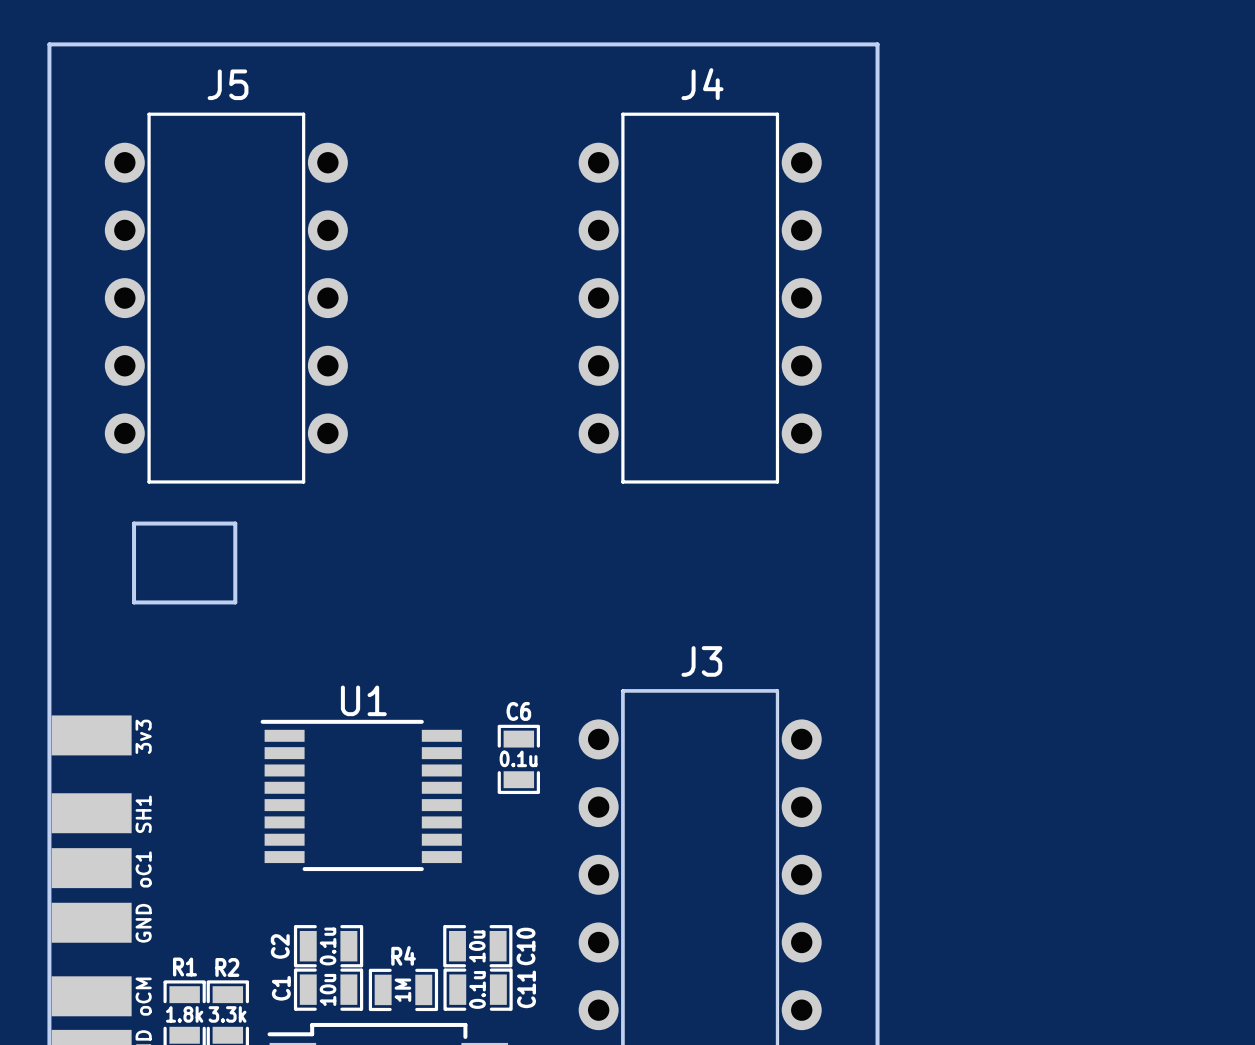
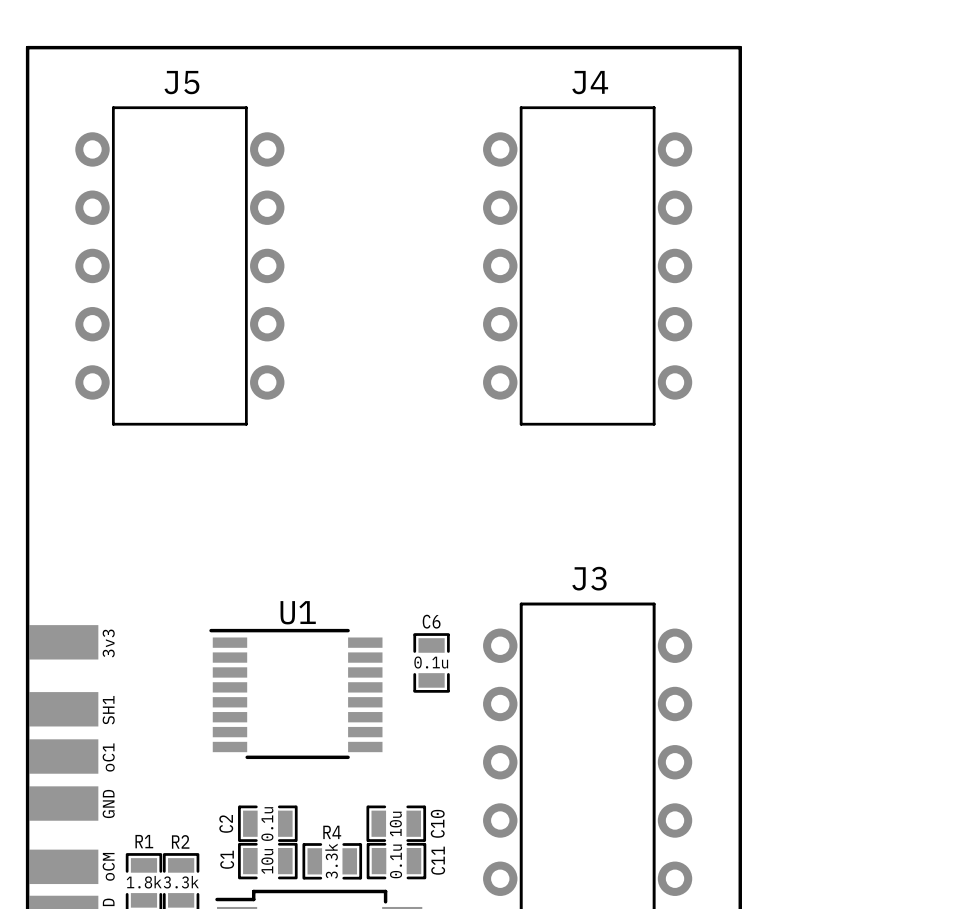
board edge: (134, 523) (134, 602) (235, 602) (235, 523) (134, 523) -> none
R4 value: 1M (402, 990) -> 3.3k (331, 861)

